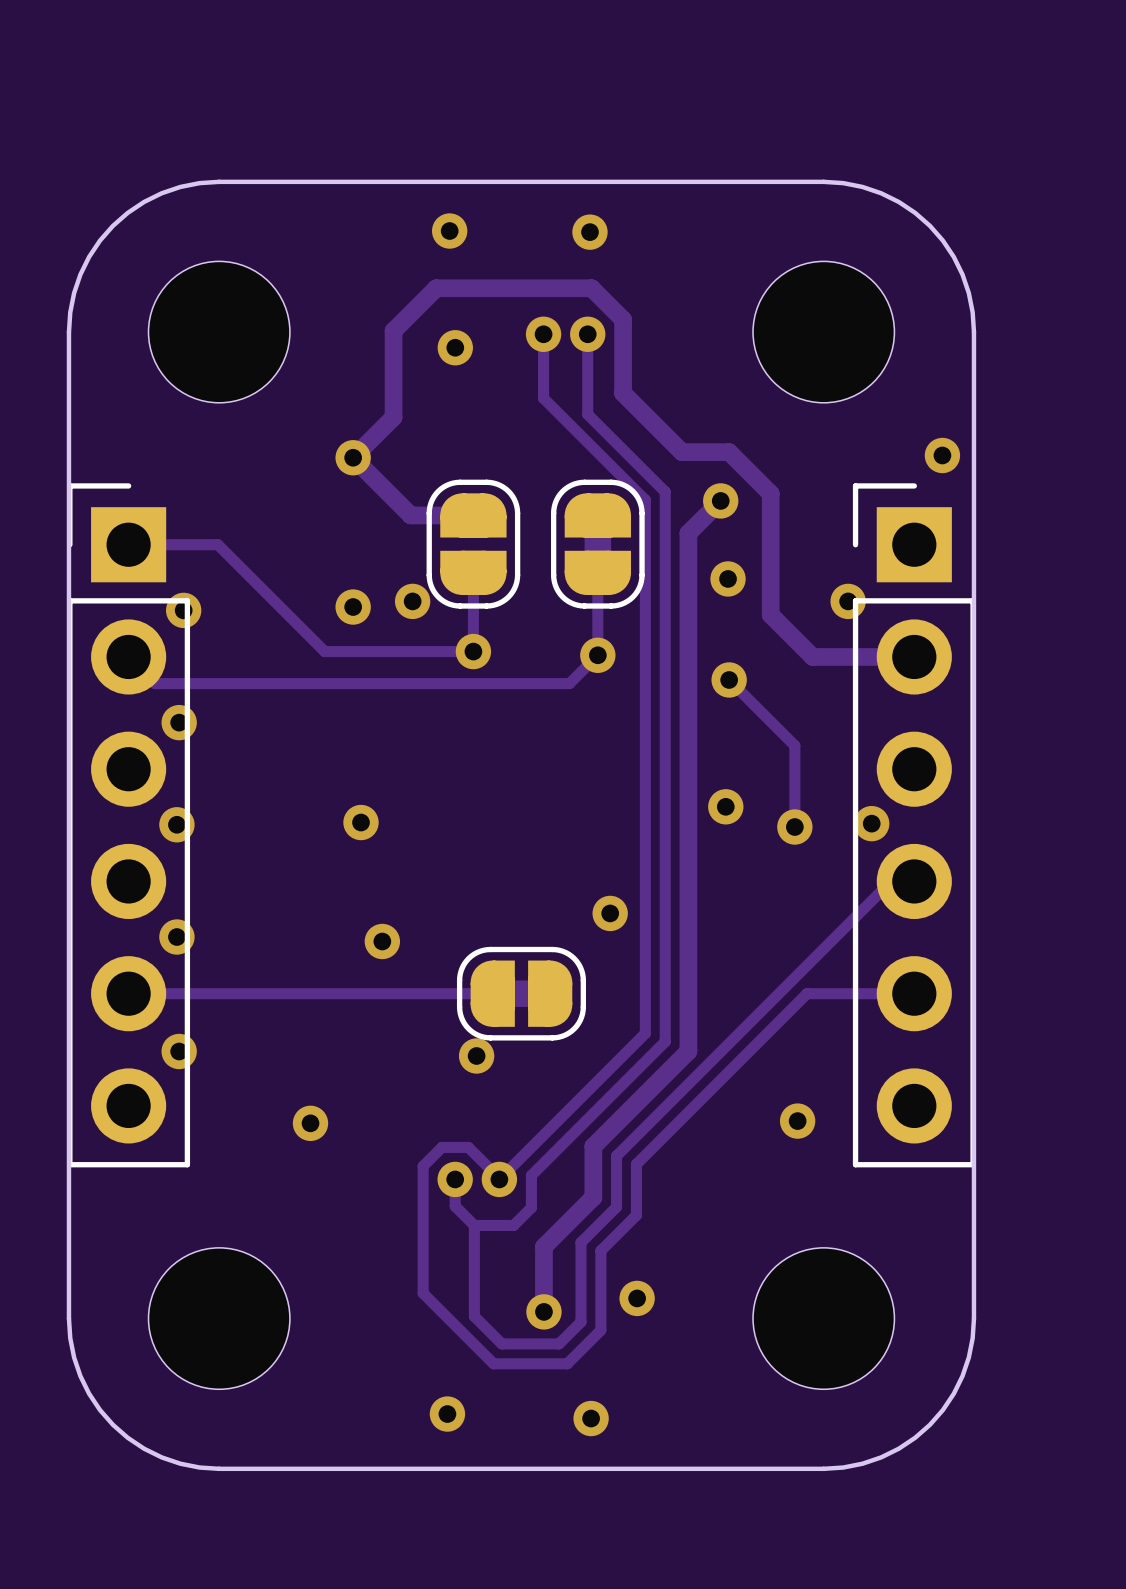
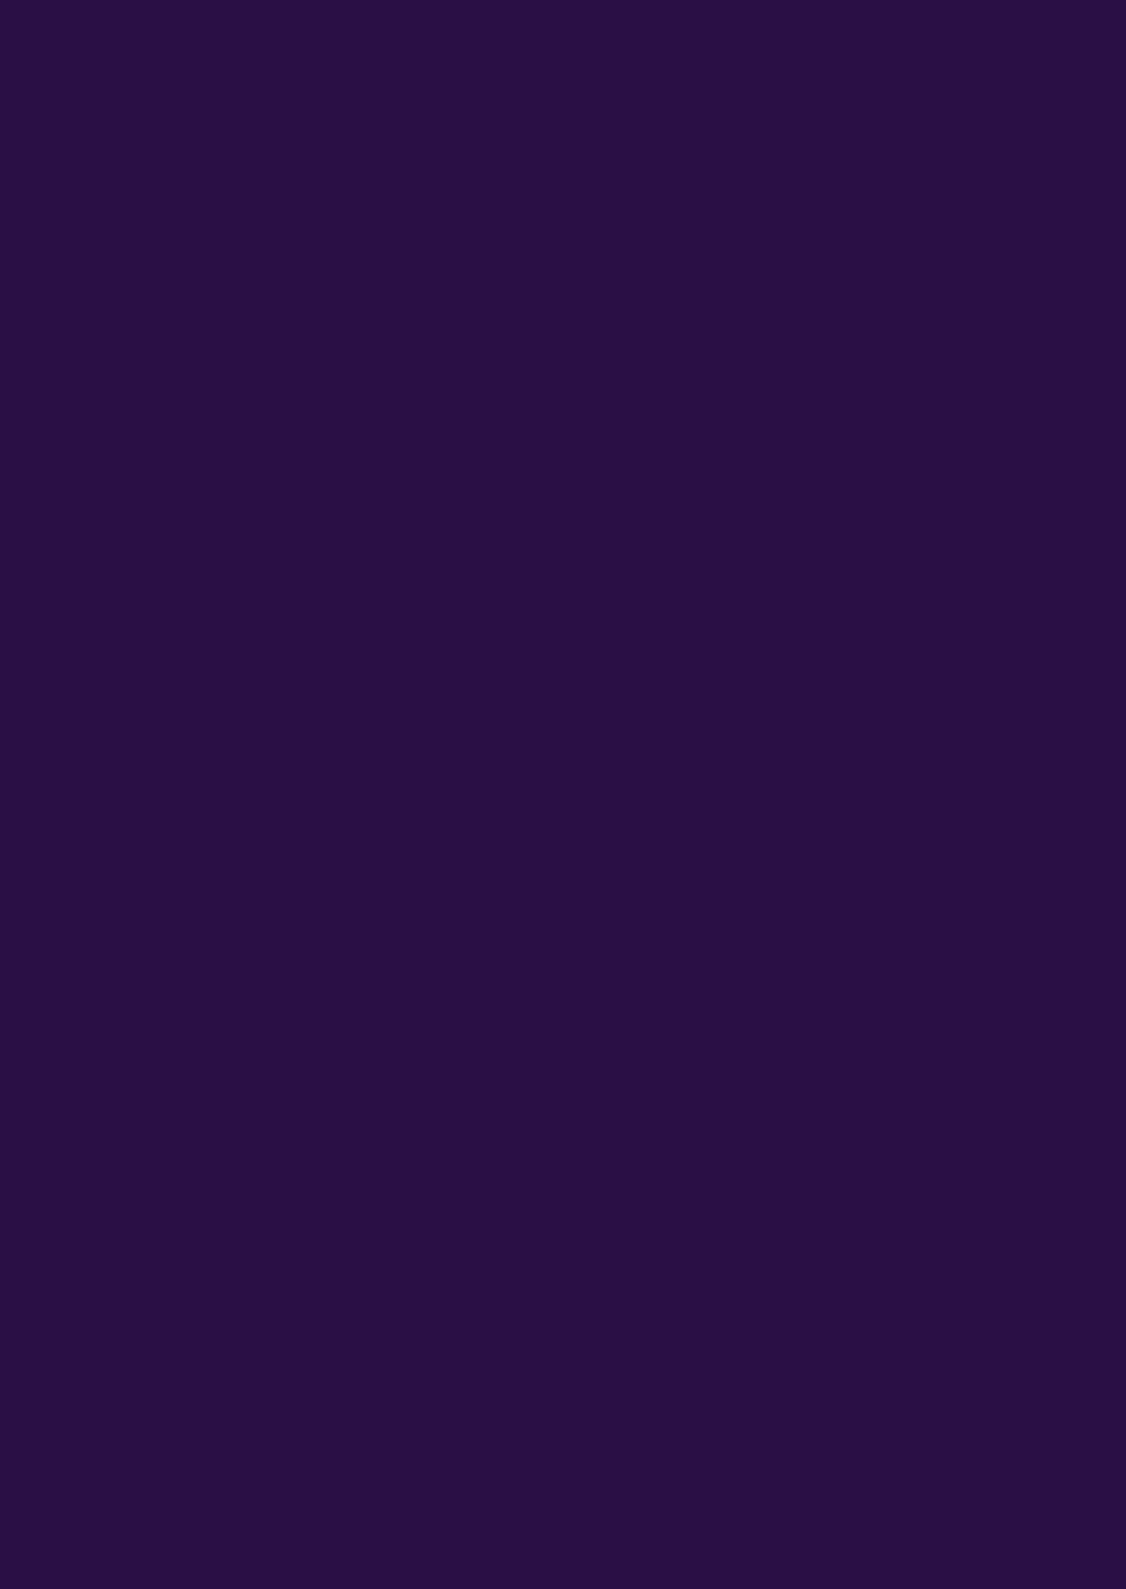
board edge: (823, 181) (199, 183) (161, 193) (127, 212) (112, 225) (89, 256) (74, 293) (68, 332) (68, 1318) (74, 1357) (89, 1393) (112, 1424) (144, 1448) (180, 1463) (219, 1468) (843, 1467) (881, 1457) (915, 1437) (929, 1424) (953, 1393) (968, 1357) (973, 1318) (972, 312) (962, 274) (953, 256) (942, 240) (915, 212) (881, 193) (862, 186) (823, 181) -> none
via: (449, 231) -> none
via: (589, 232) -> none
part: (219, 332) -> none
part: (823, 332) -> none
track: (543, 334) (543, 398) (645, 500) (645, 1033) (499, 1179) (468, 1147) (441, 1147) (423, 1166) (423, 1293) (493, 1363) (567, 1363) (600, 1330) (600, 1250) (636, 1215) (636, 1164) (806, 993) (914, 993) -> none
via: (543, 334) -> none
track: (587, 334) (587, 414) (665, 491) (665, 1041) (531, 1175) (531, 1207) (513, 1225) (474, 1225) -> none
via: (587, 334) -> none
via: (455, 347) -> none
via: (942, 455) -> none
via: (353, 457) -> none
track: (720, 500) (688, 533) (688, 1051) (593, 1146) (593, 1197) (543, 1246) (543, 1311) -> none
via: (720, 500) -> none
track: (473, 515) (410, 515) (353, 457) (393, 417) (393, 330) (436, 288) (591, 288) (623, 319) (623, 393) (682, 452) (729, 452) (770, 493) (770, 614) (812, 656) (914, 656) -> none
track: (128, 544) (217, 544) (324, 651) (473, 651) (473, 572) -> none
part: (473, 544) -> none
part: (597, 544) -> none
track: (597, 572) (597, 655) (569, 683) (155, 683) (128, 656) -> none
via: (728, 578) -> none
via: (412, 601) -> none
via: (848, 601) -> none
via: (353, 607) -> none
via: (183, 610) -> none
via: (473, 651) -> none
via: (597, 655) -> none
track: (729, 679) (794, 745) (794, 827) -> none
via: (729, 679) -> none
via: (179, 722) -> none
via: (725, 806) -> none
via: (361, 822) -> none
via: (871, 823) -> none
via: (176, 824) -> none
part: (128, 825) -> none
part: (914, 825) -> none
via: (794, 827) -> none
track: (914, 881) (891, 881) (616, 1156) (616, 1207) (581, 1242) (581, 1322) (559, 1343) (501, 1343) (474, 1316) (474, 1225) -> none
via: (610, 913) -> none
via: (176, 937) -> none
via: (382, 941) -> none
track: (492, 993) (128, 993) -> none
part: (521, 993) -> none
via: (179, 1051) -> none
via: (476, 1055) -> none
via: (797, 1121) -> none
via: (310, 1123) -> none
track: (455, 1179) (455, 1206) (474, 1225) -> none
via: (455, 1179) -> none
via: (499, 1179) -> none
via: (637, 1298) -> none
via: (543, 1311) -> none
part: (219, 1318) -> none
part: (823, 1318) -> none
via: (447, 1414) -> none
via: (591, 1418) -> none

